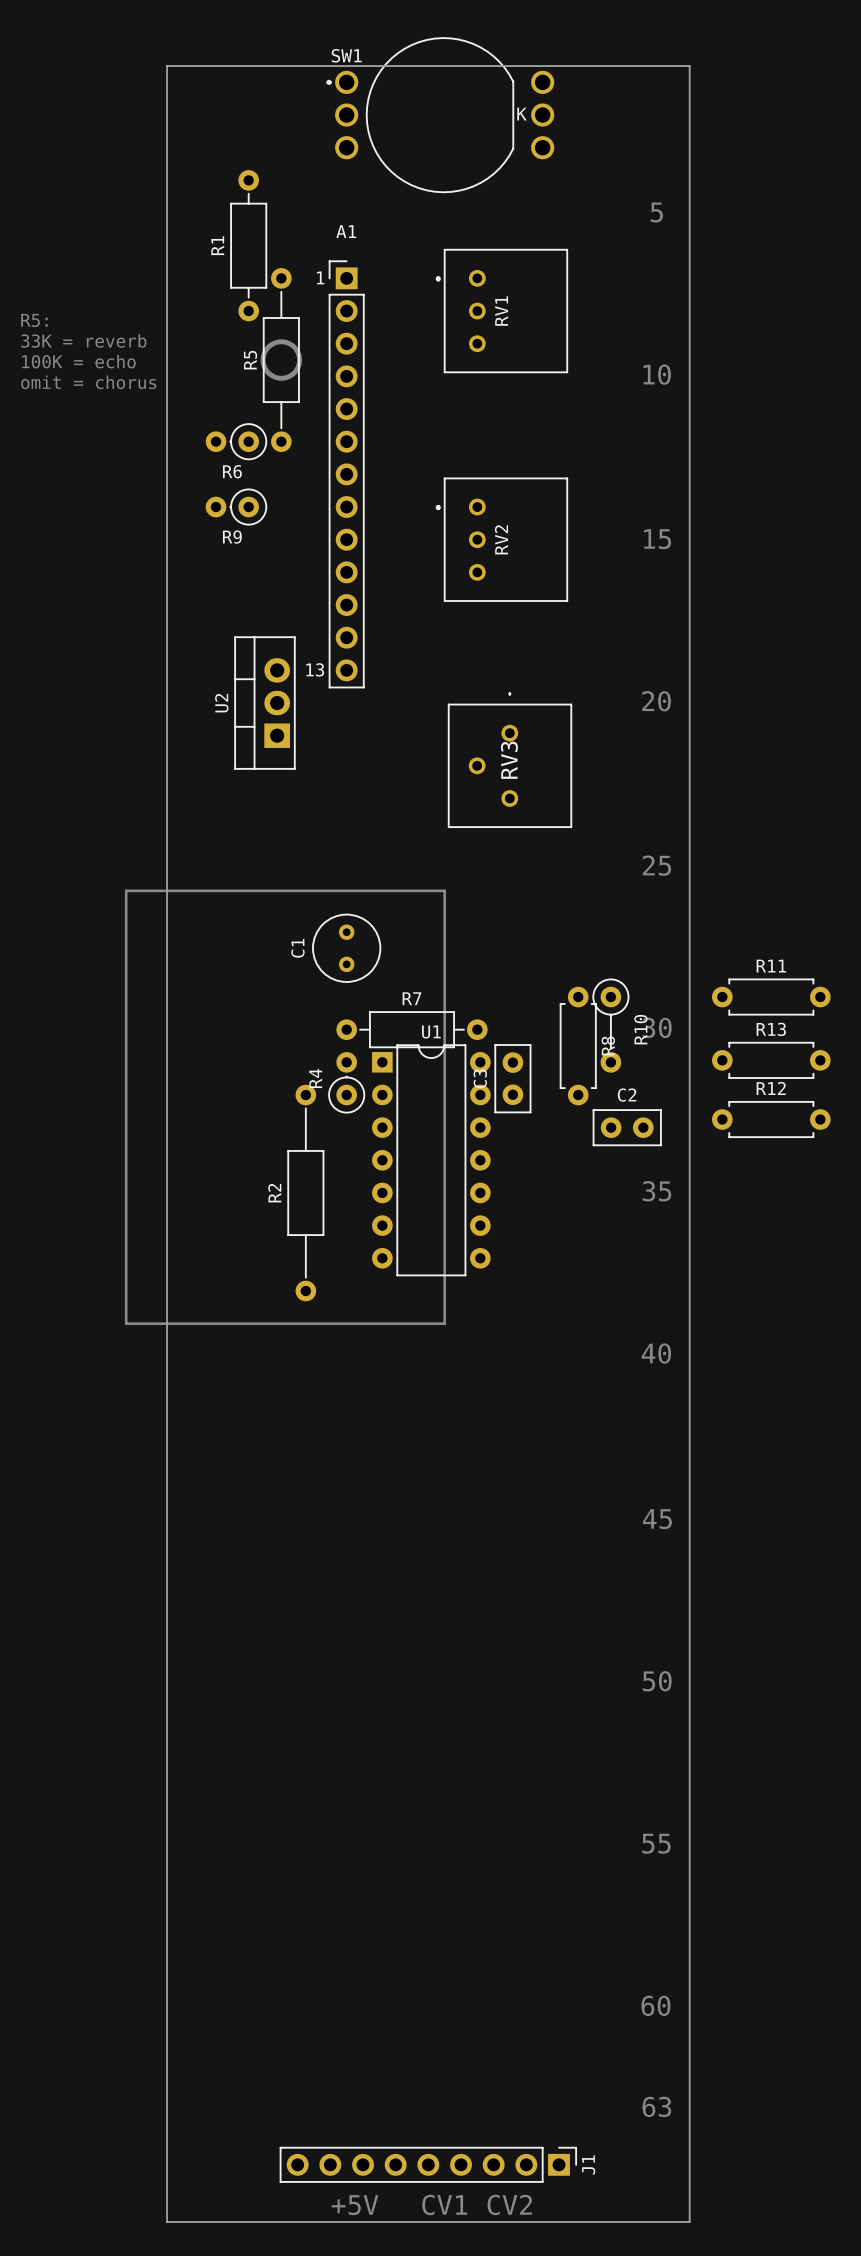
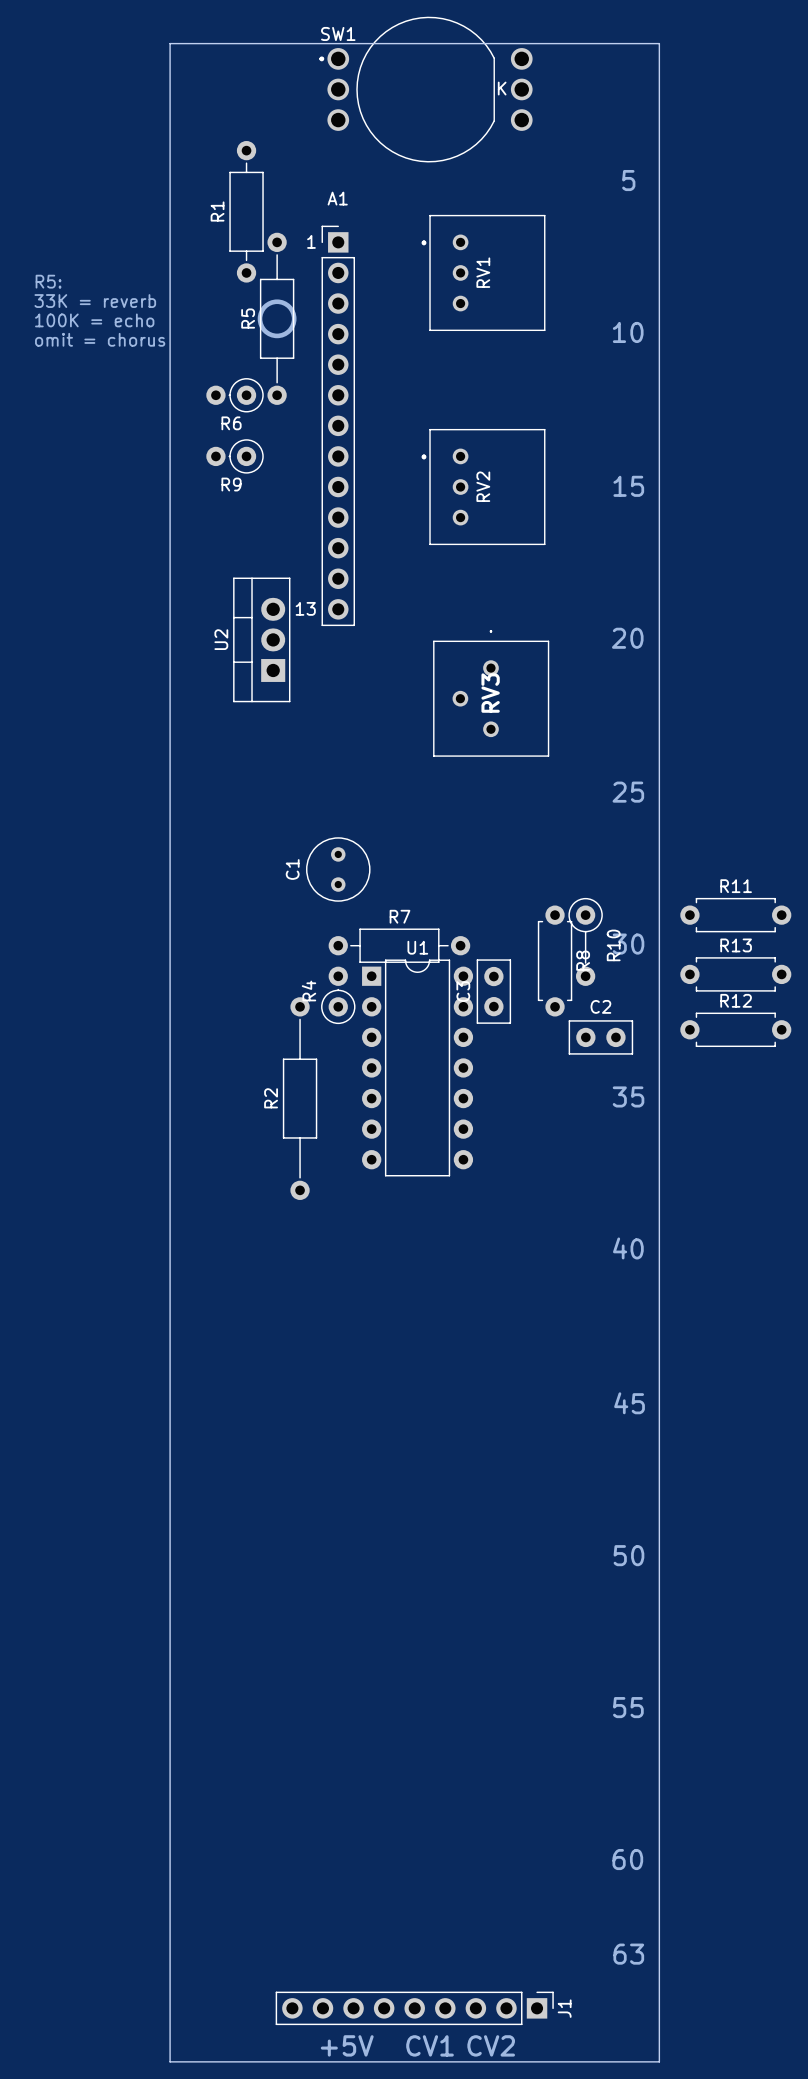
line: (126, 890) (444, 890) (444, 1323) (126, 1323) (126, 890) -> none

